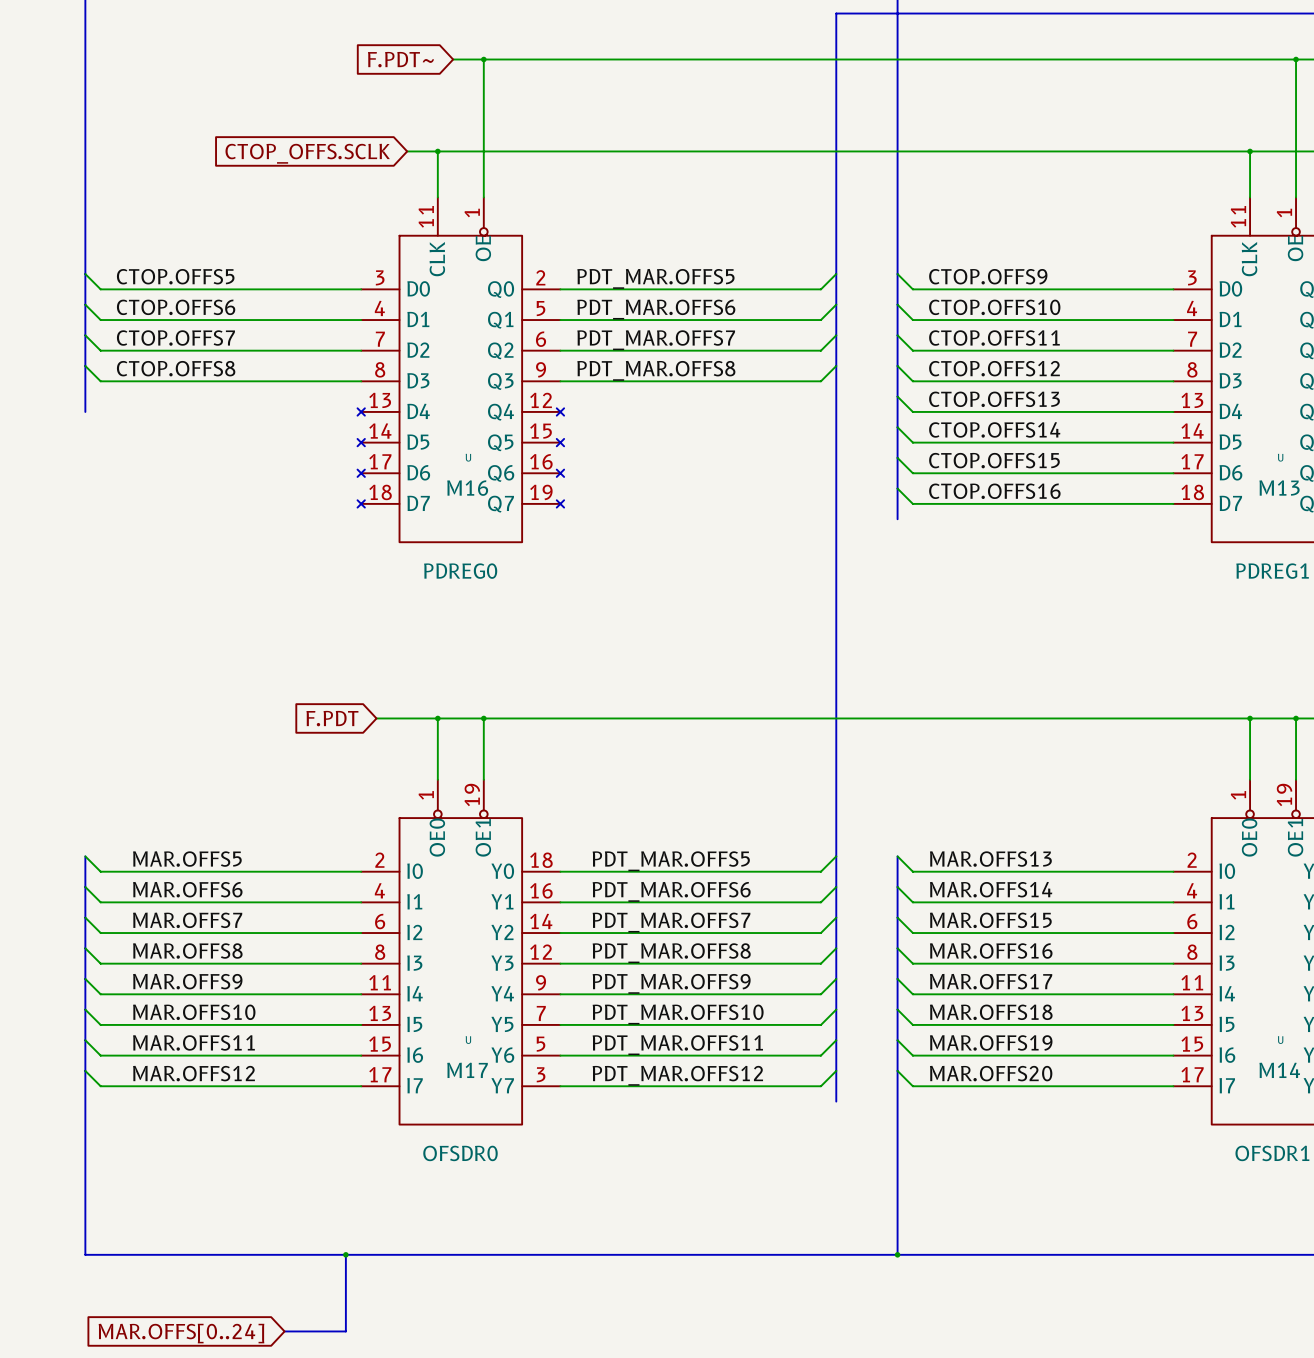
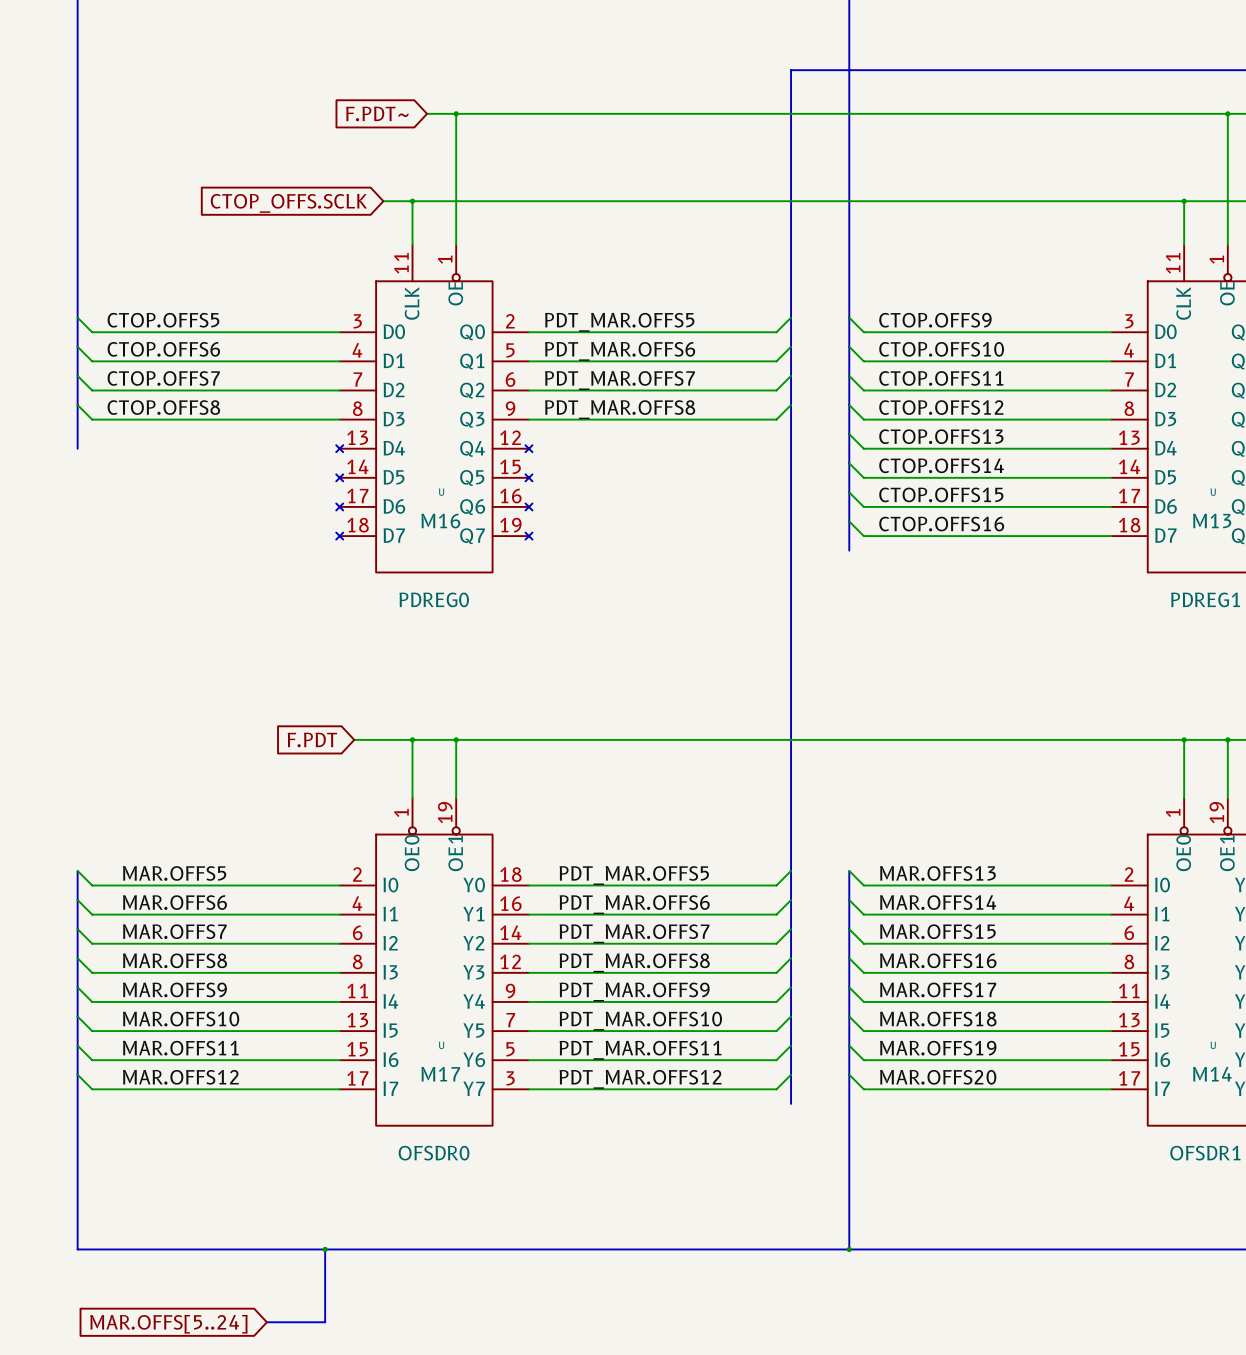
global label: MAR.OFFS[0..24] (181, 1333) -> MAR.OFFS[5..24] (168, 1324)

